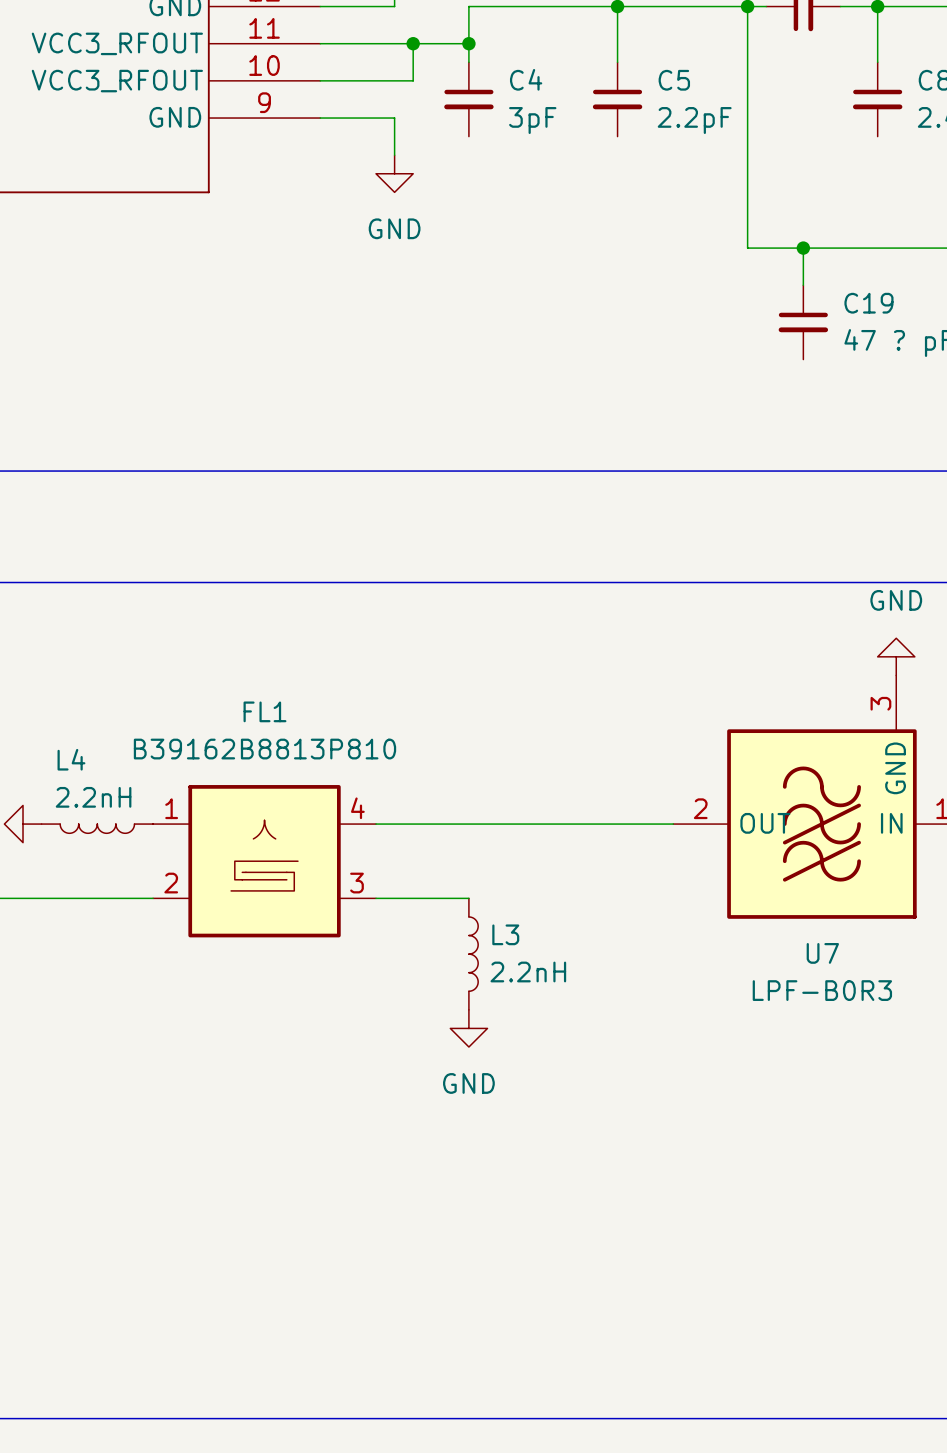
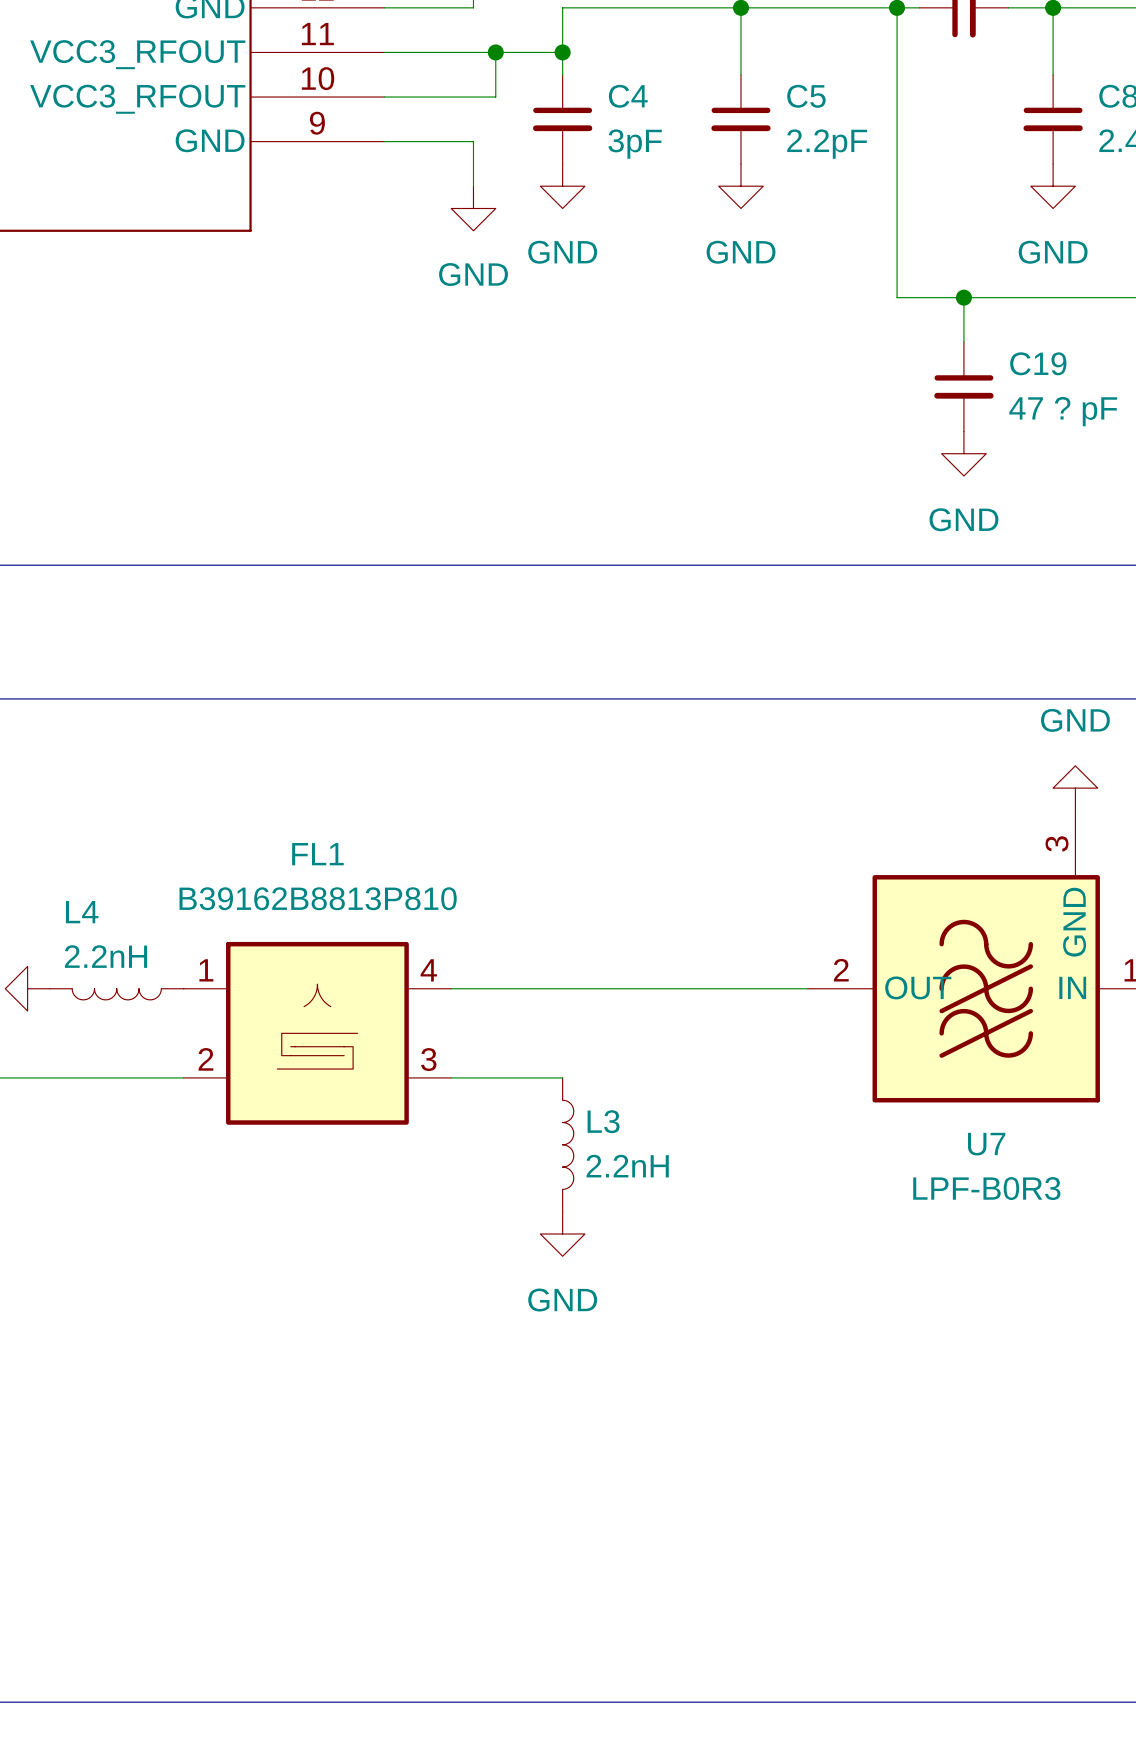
power symbol: none -> GND (562, 186)
power symbol: none -> GND (740, 186)
power symbol: none -> GND (1053, 186)
power symbol: none -> GND (963, 453)

